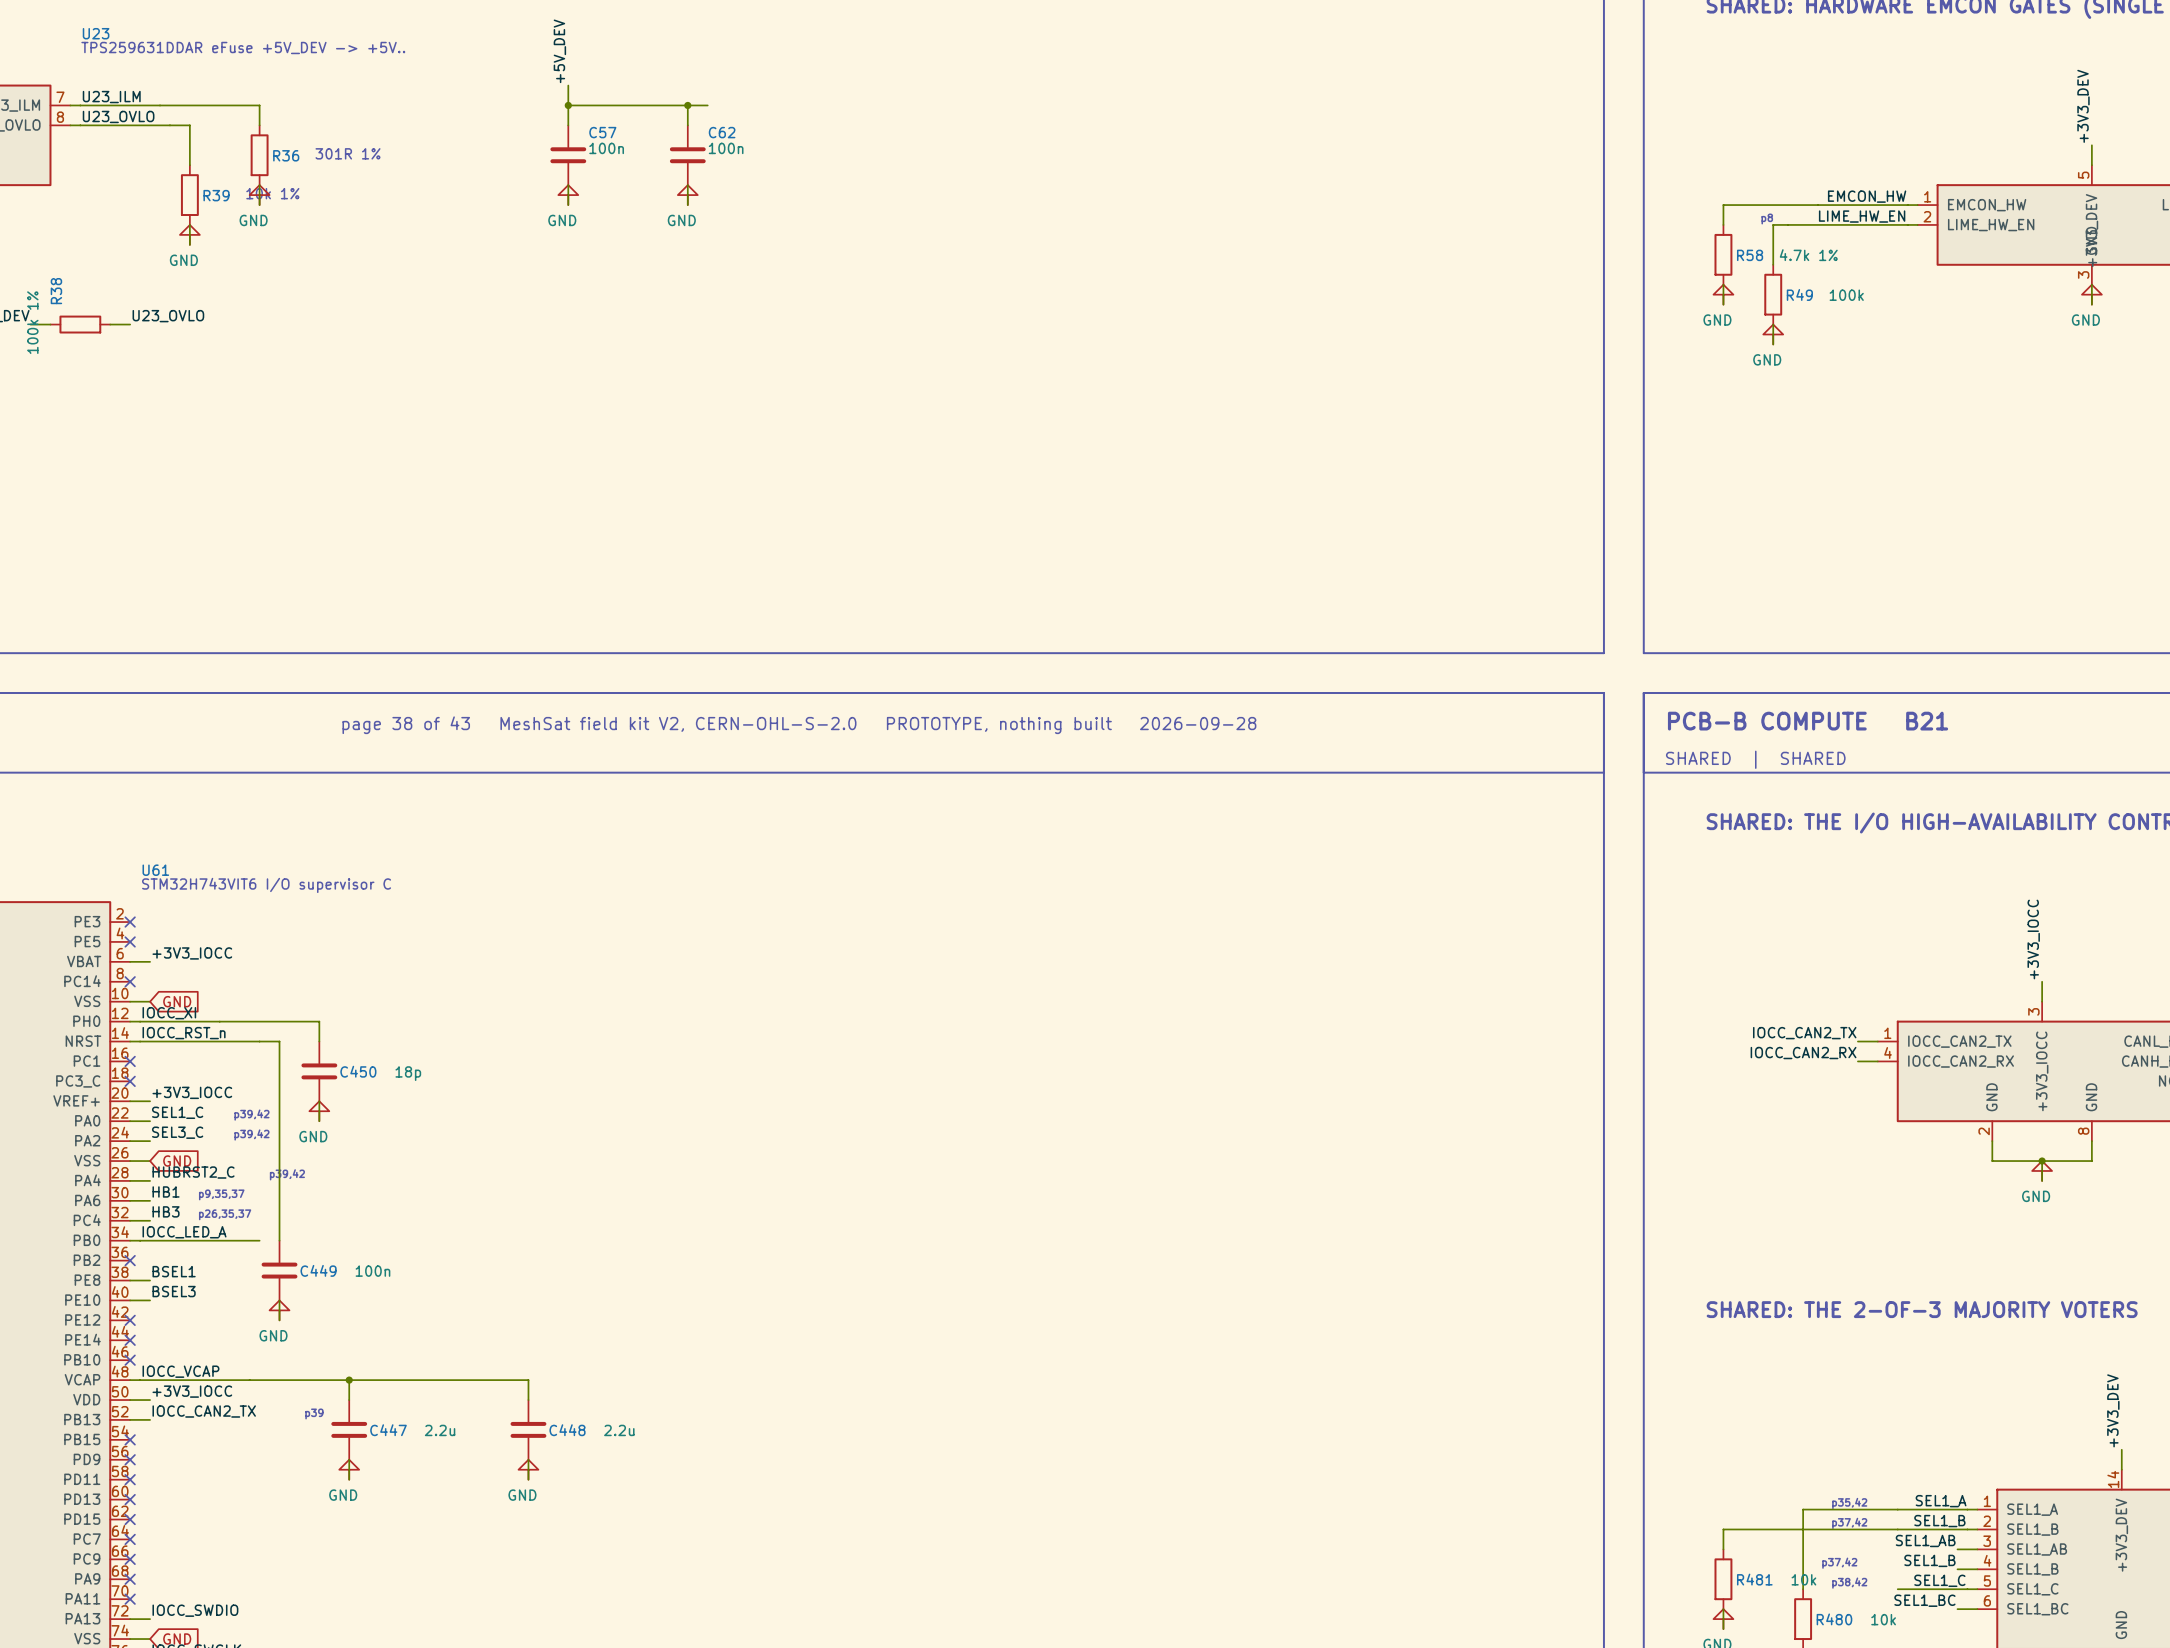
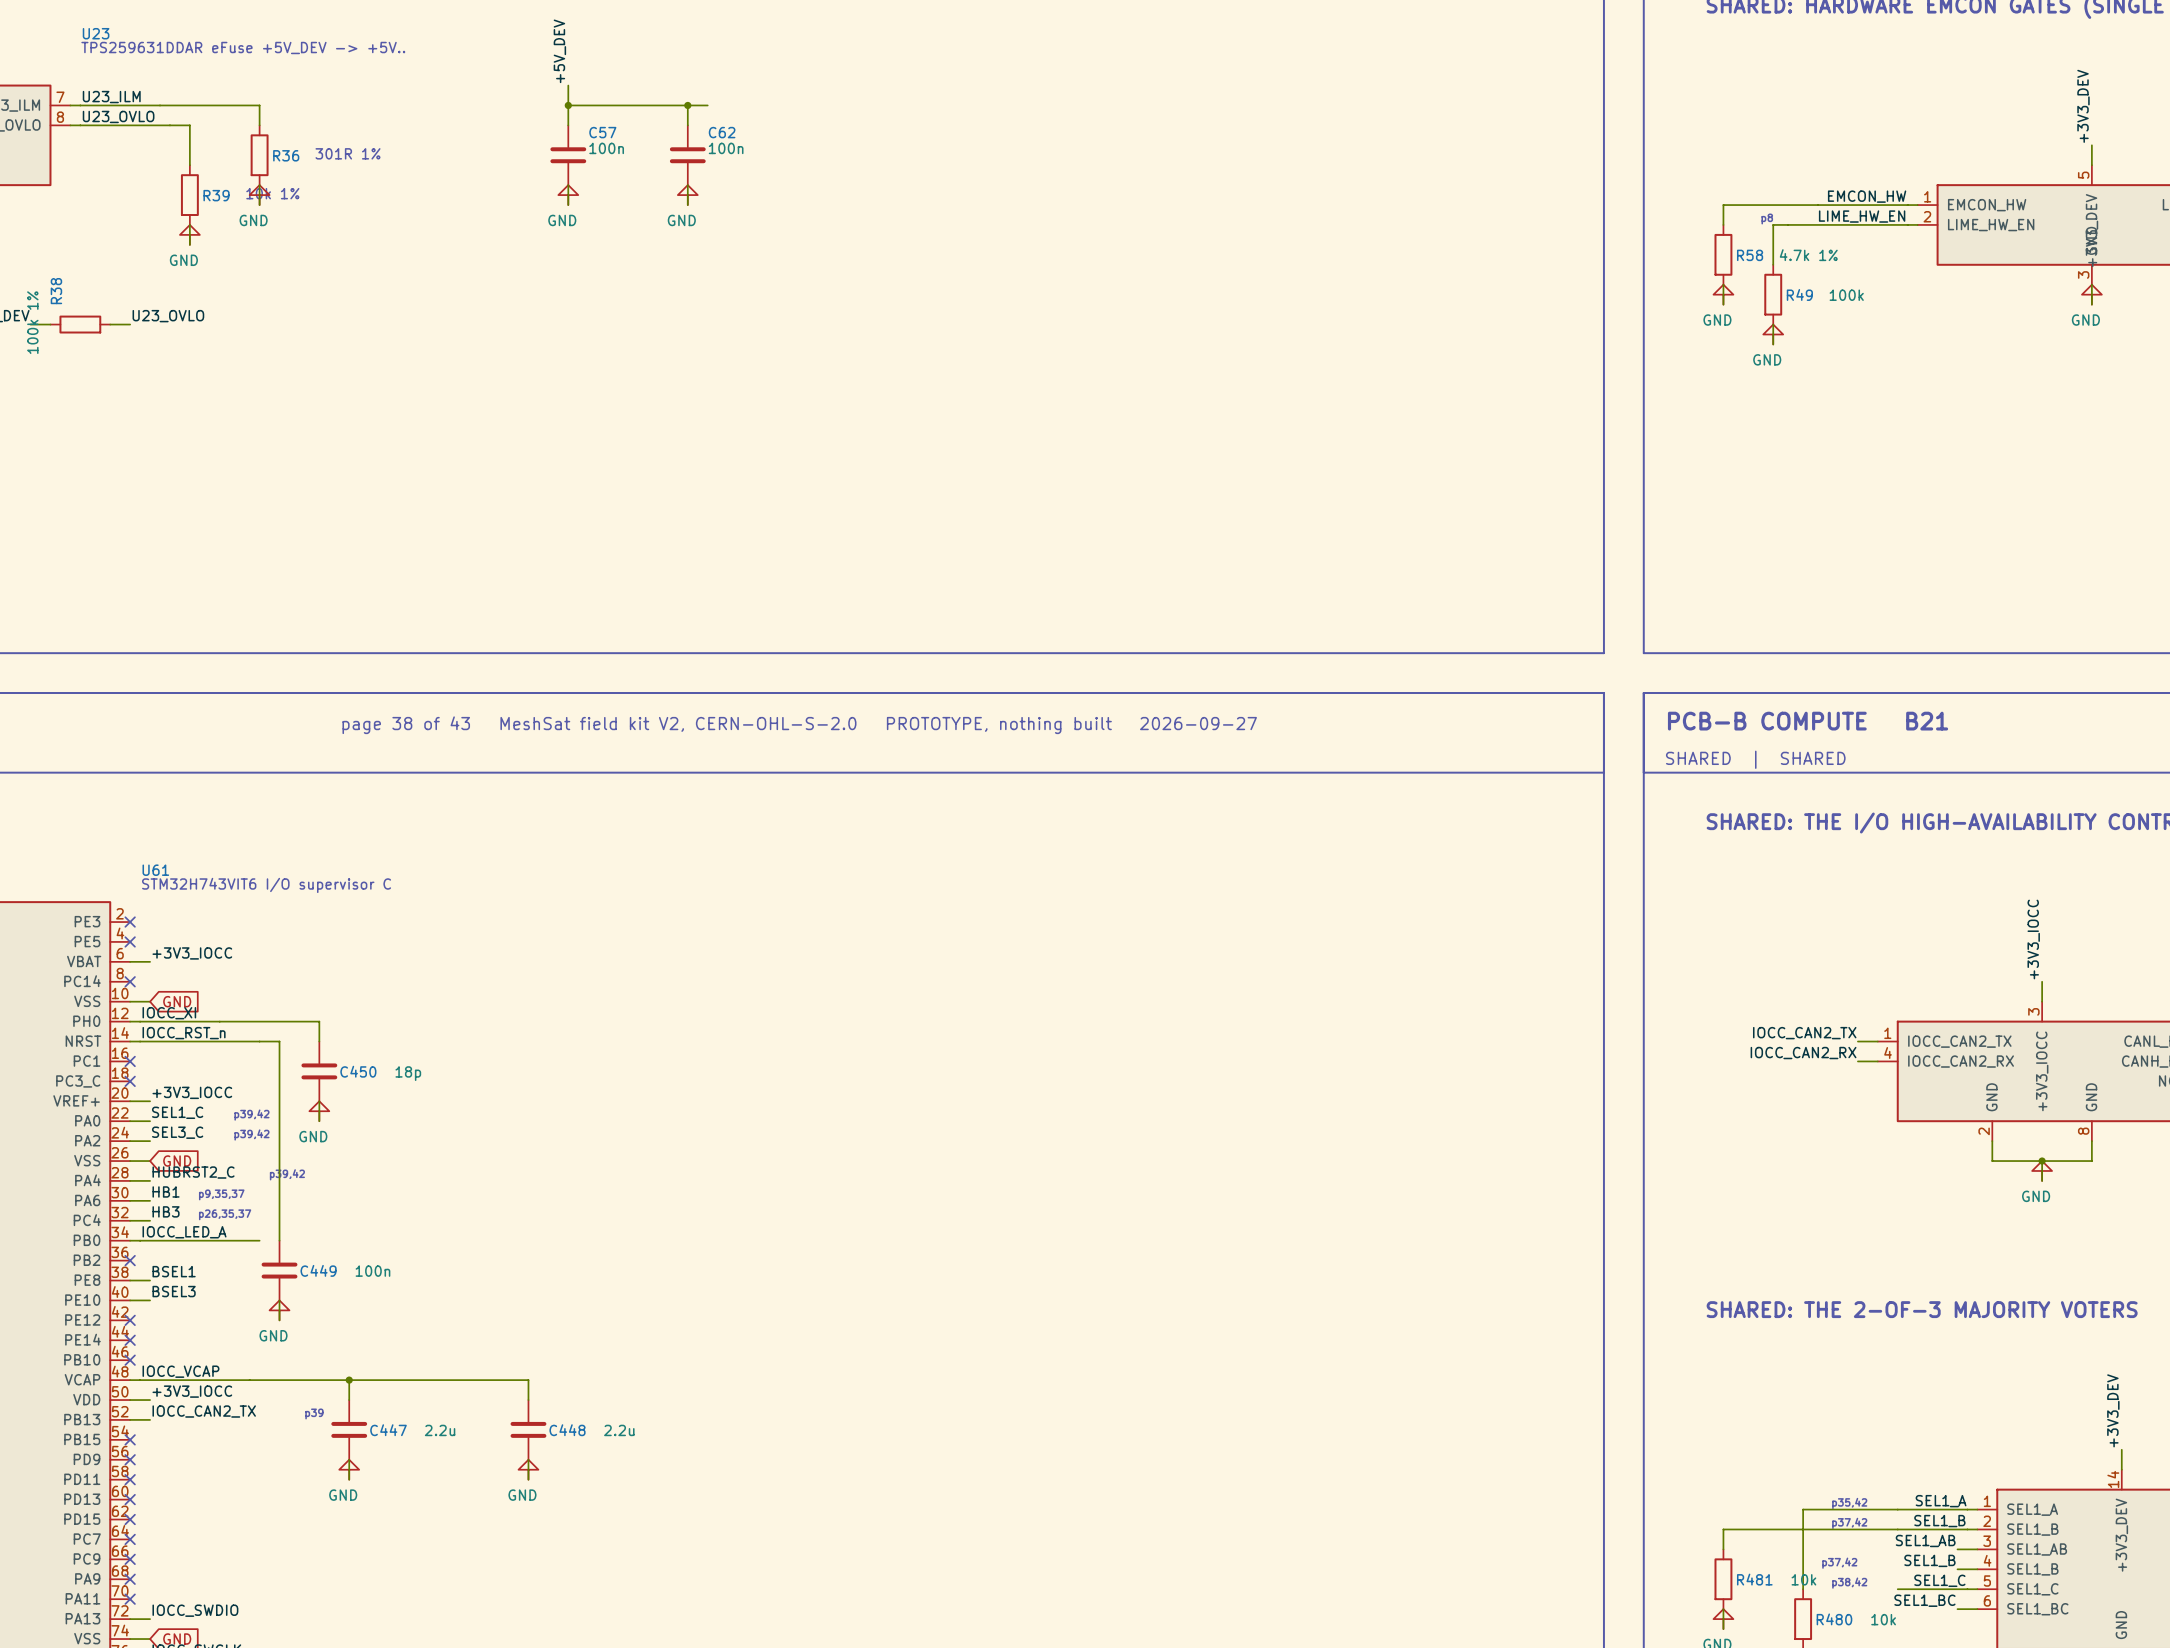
text: page 38 of 43 MeshSat field kit V2, CERN-OHL-S-2.0 PROTOTYPE, nothing built 2026-09-28 (799, 725) -> page 38 of 43 MeshSat field kit V2, CERN-OHL-S-2.0 PROTOTYPE, nothing built 2026-09-27 (799, 725)

